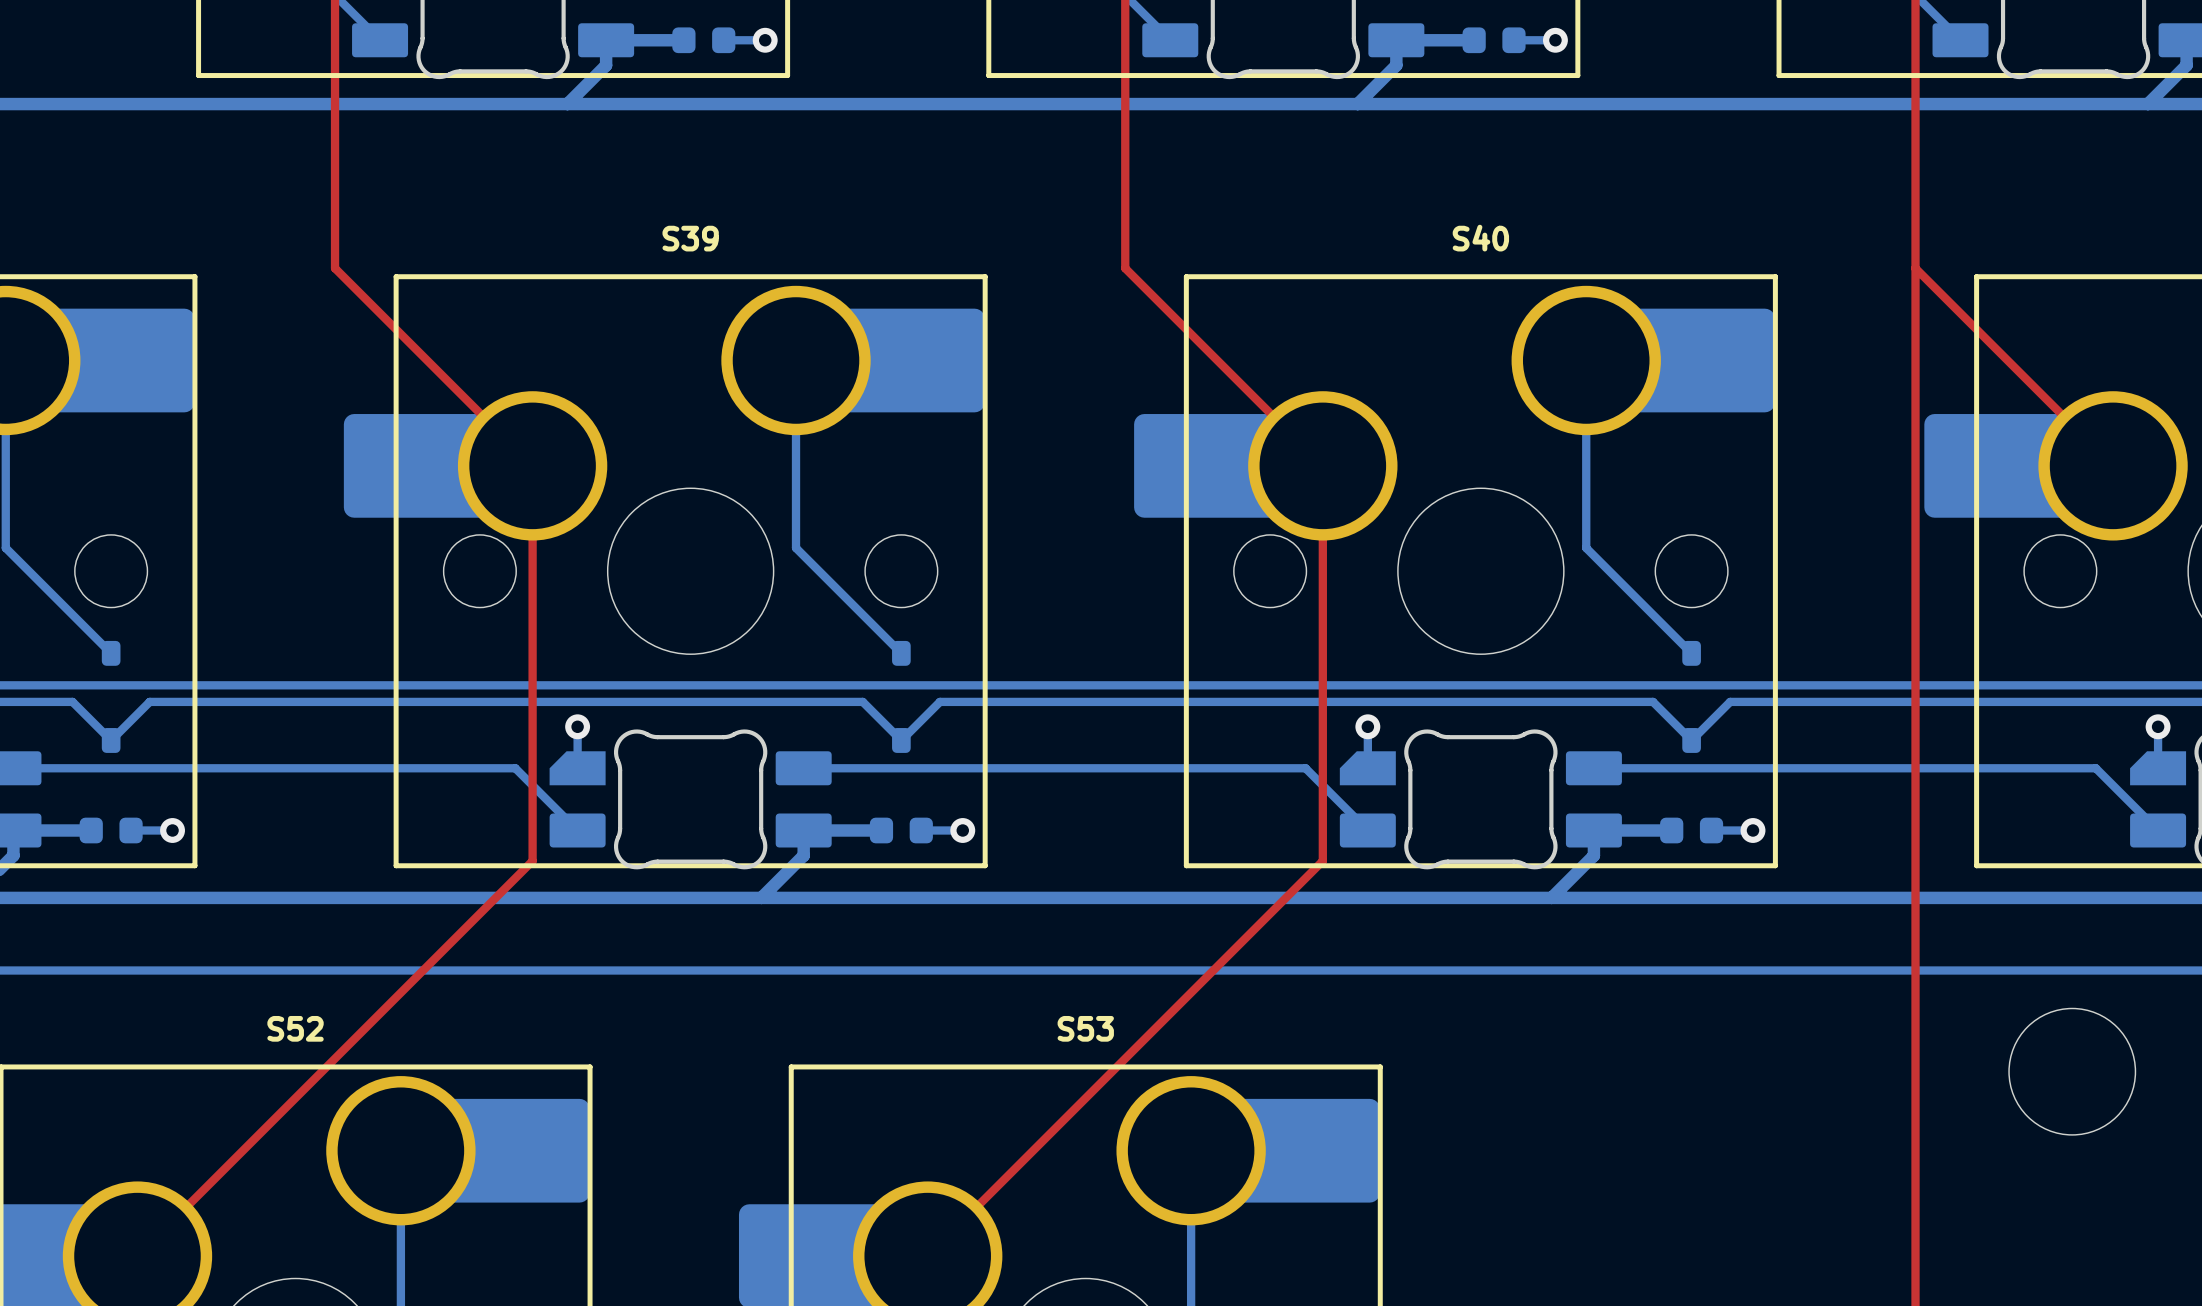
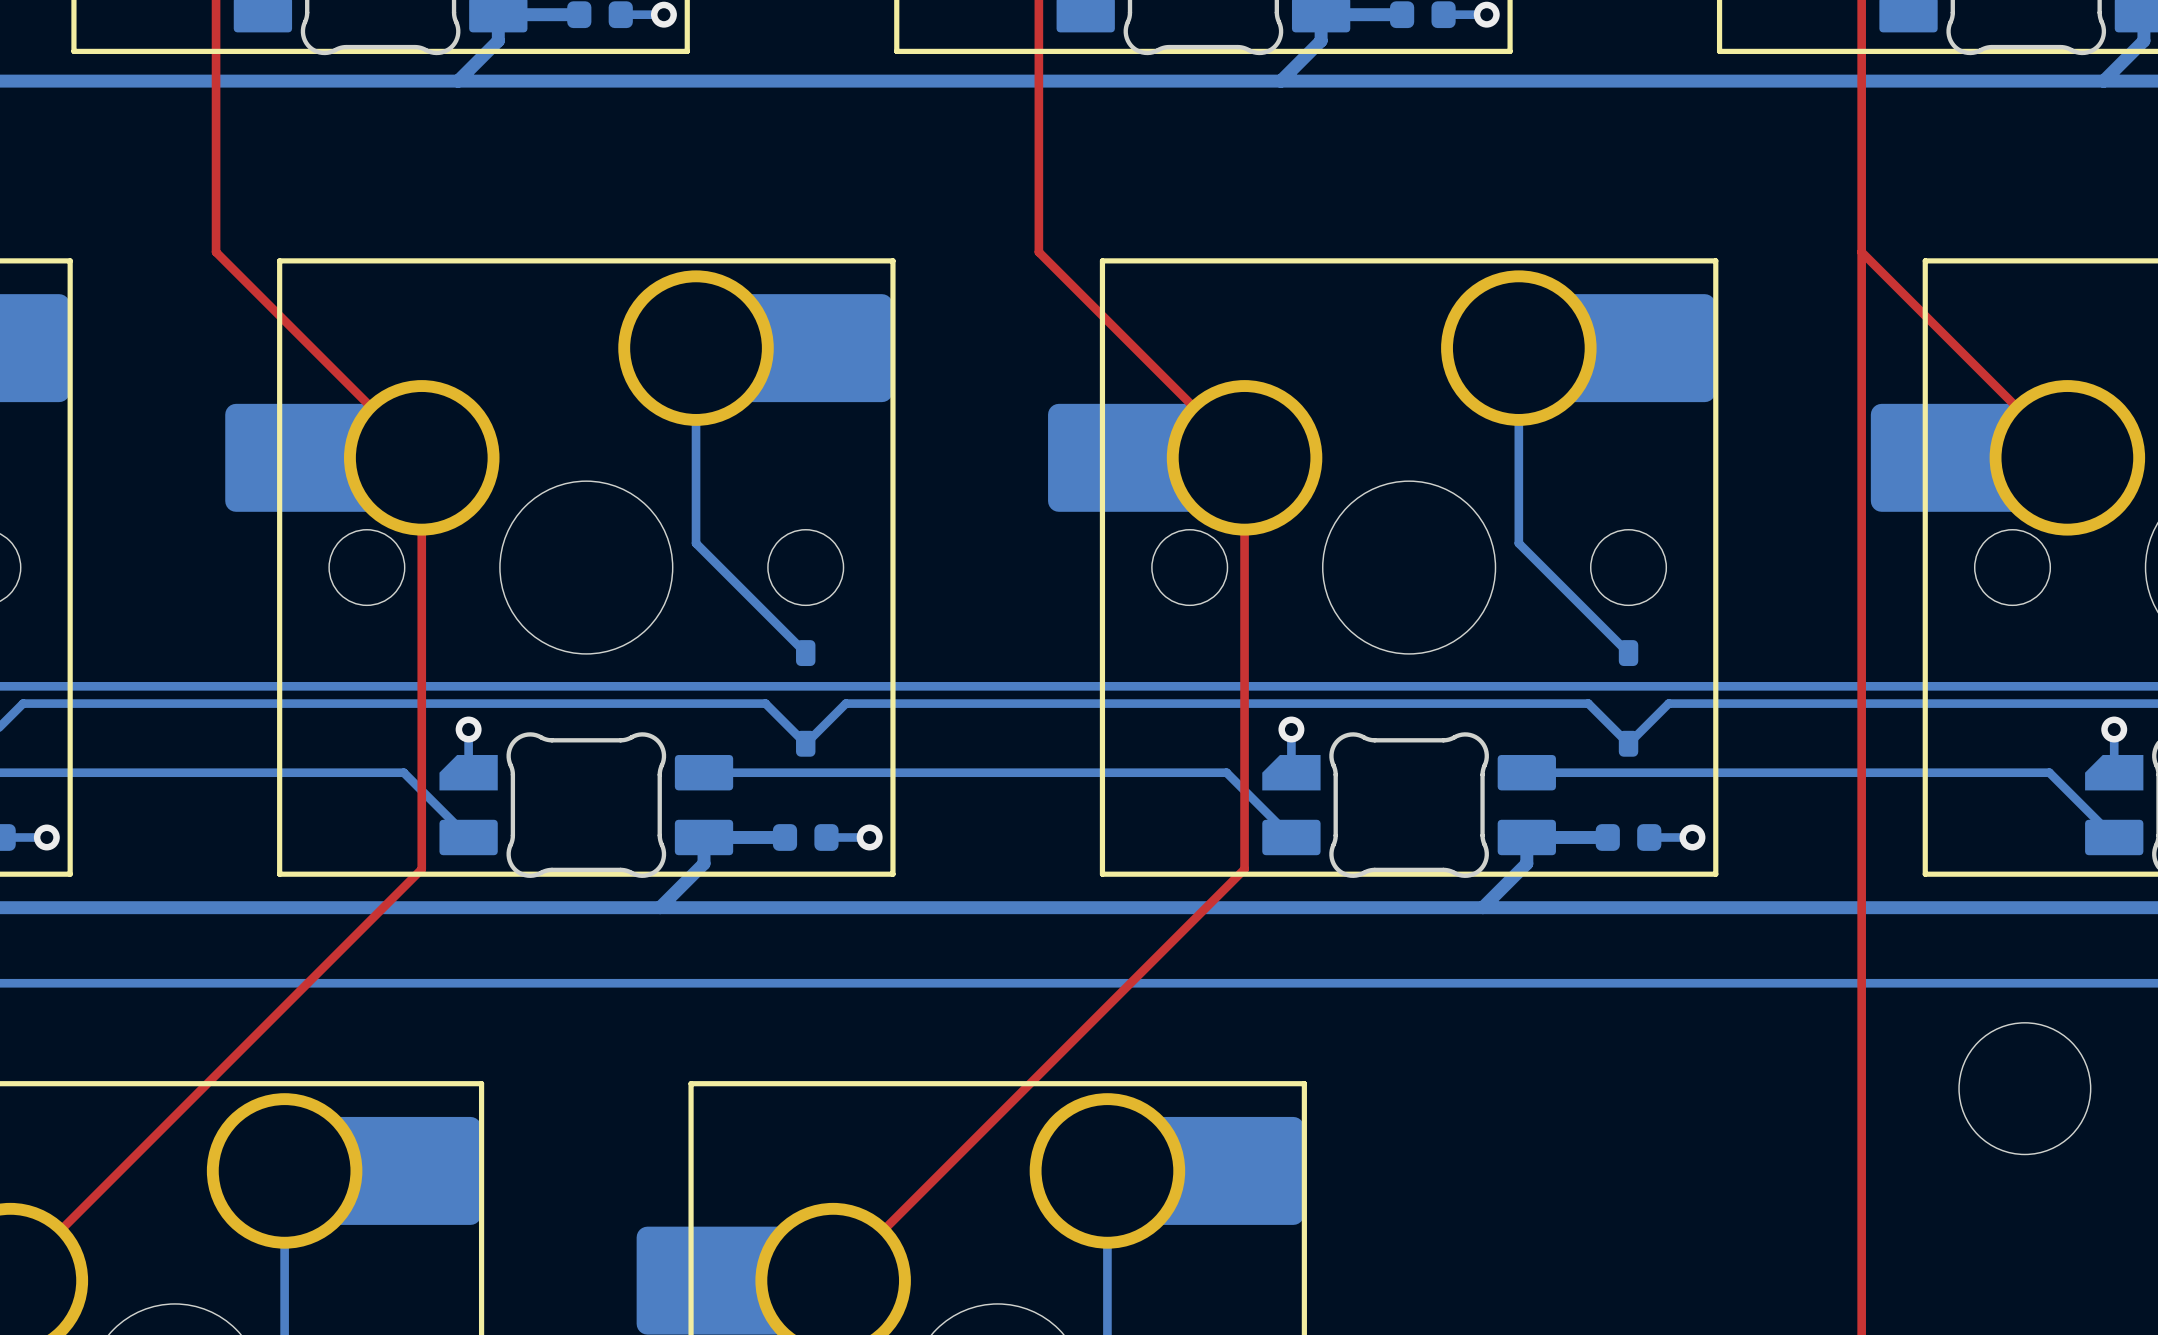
S39 name: S39 (690, 238) -> none
S40 name: S40 (1480, 238) -> none
S52 name: S52 (295, 1028) -> none
S53 name: S53 (1085, 1028) -> none

